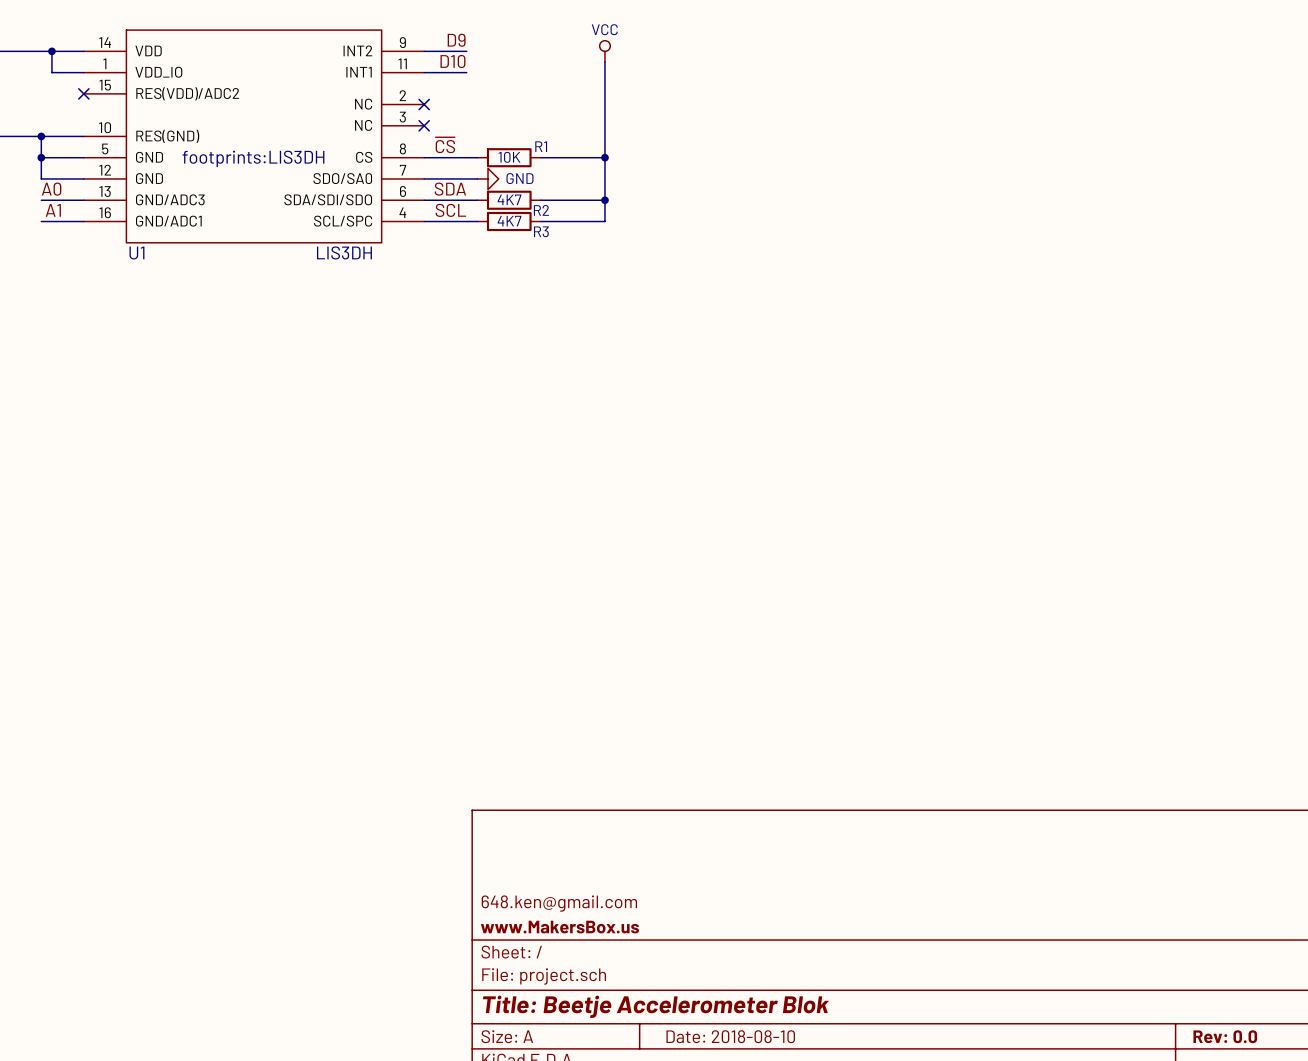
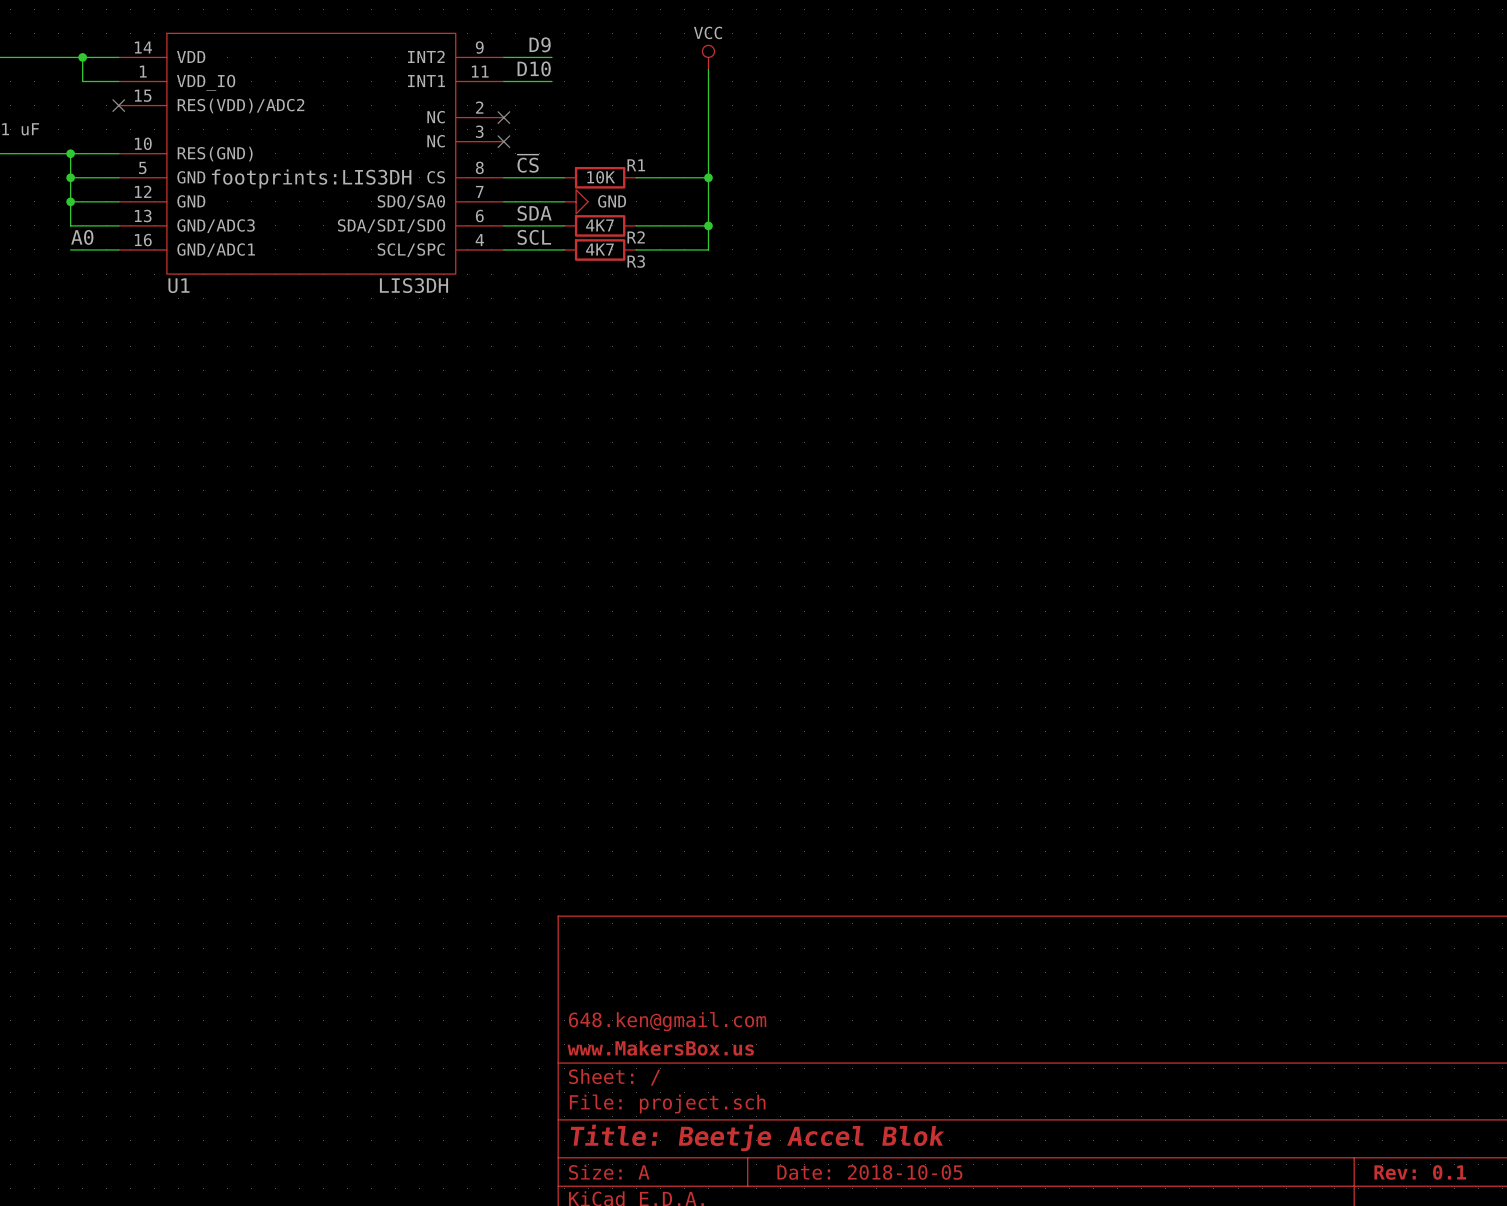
wire: none -> (70, 201) (70, 225)
junction: none -> (70, 201)
label: A0 (51, 189) -> none
label: A1 (53, 210) -> A0 (82, 237)
title block: Title: Beetje Accelerometer Blok (655, 1006) -> Title: Beetje Accel Blok (757, 1137)
title block: Date: 2018-08-10 (730, 1036) -> Date: 2018-10-05 (869, 1172)
title block: Rev: 0.0 (1225, 1036) -> Rev: 0.1 (1420, 1172)

